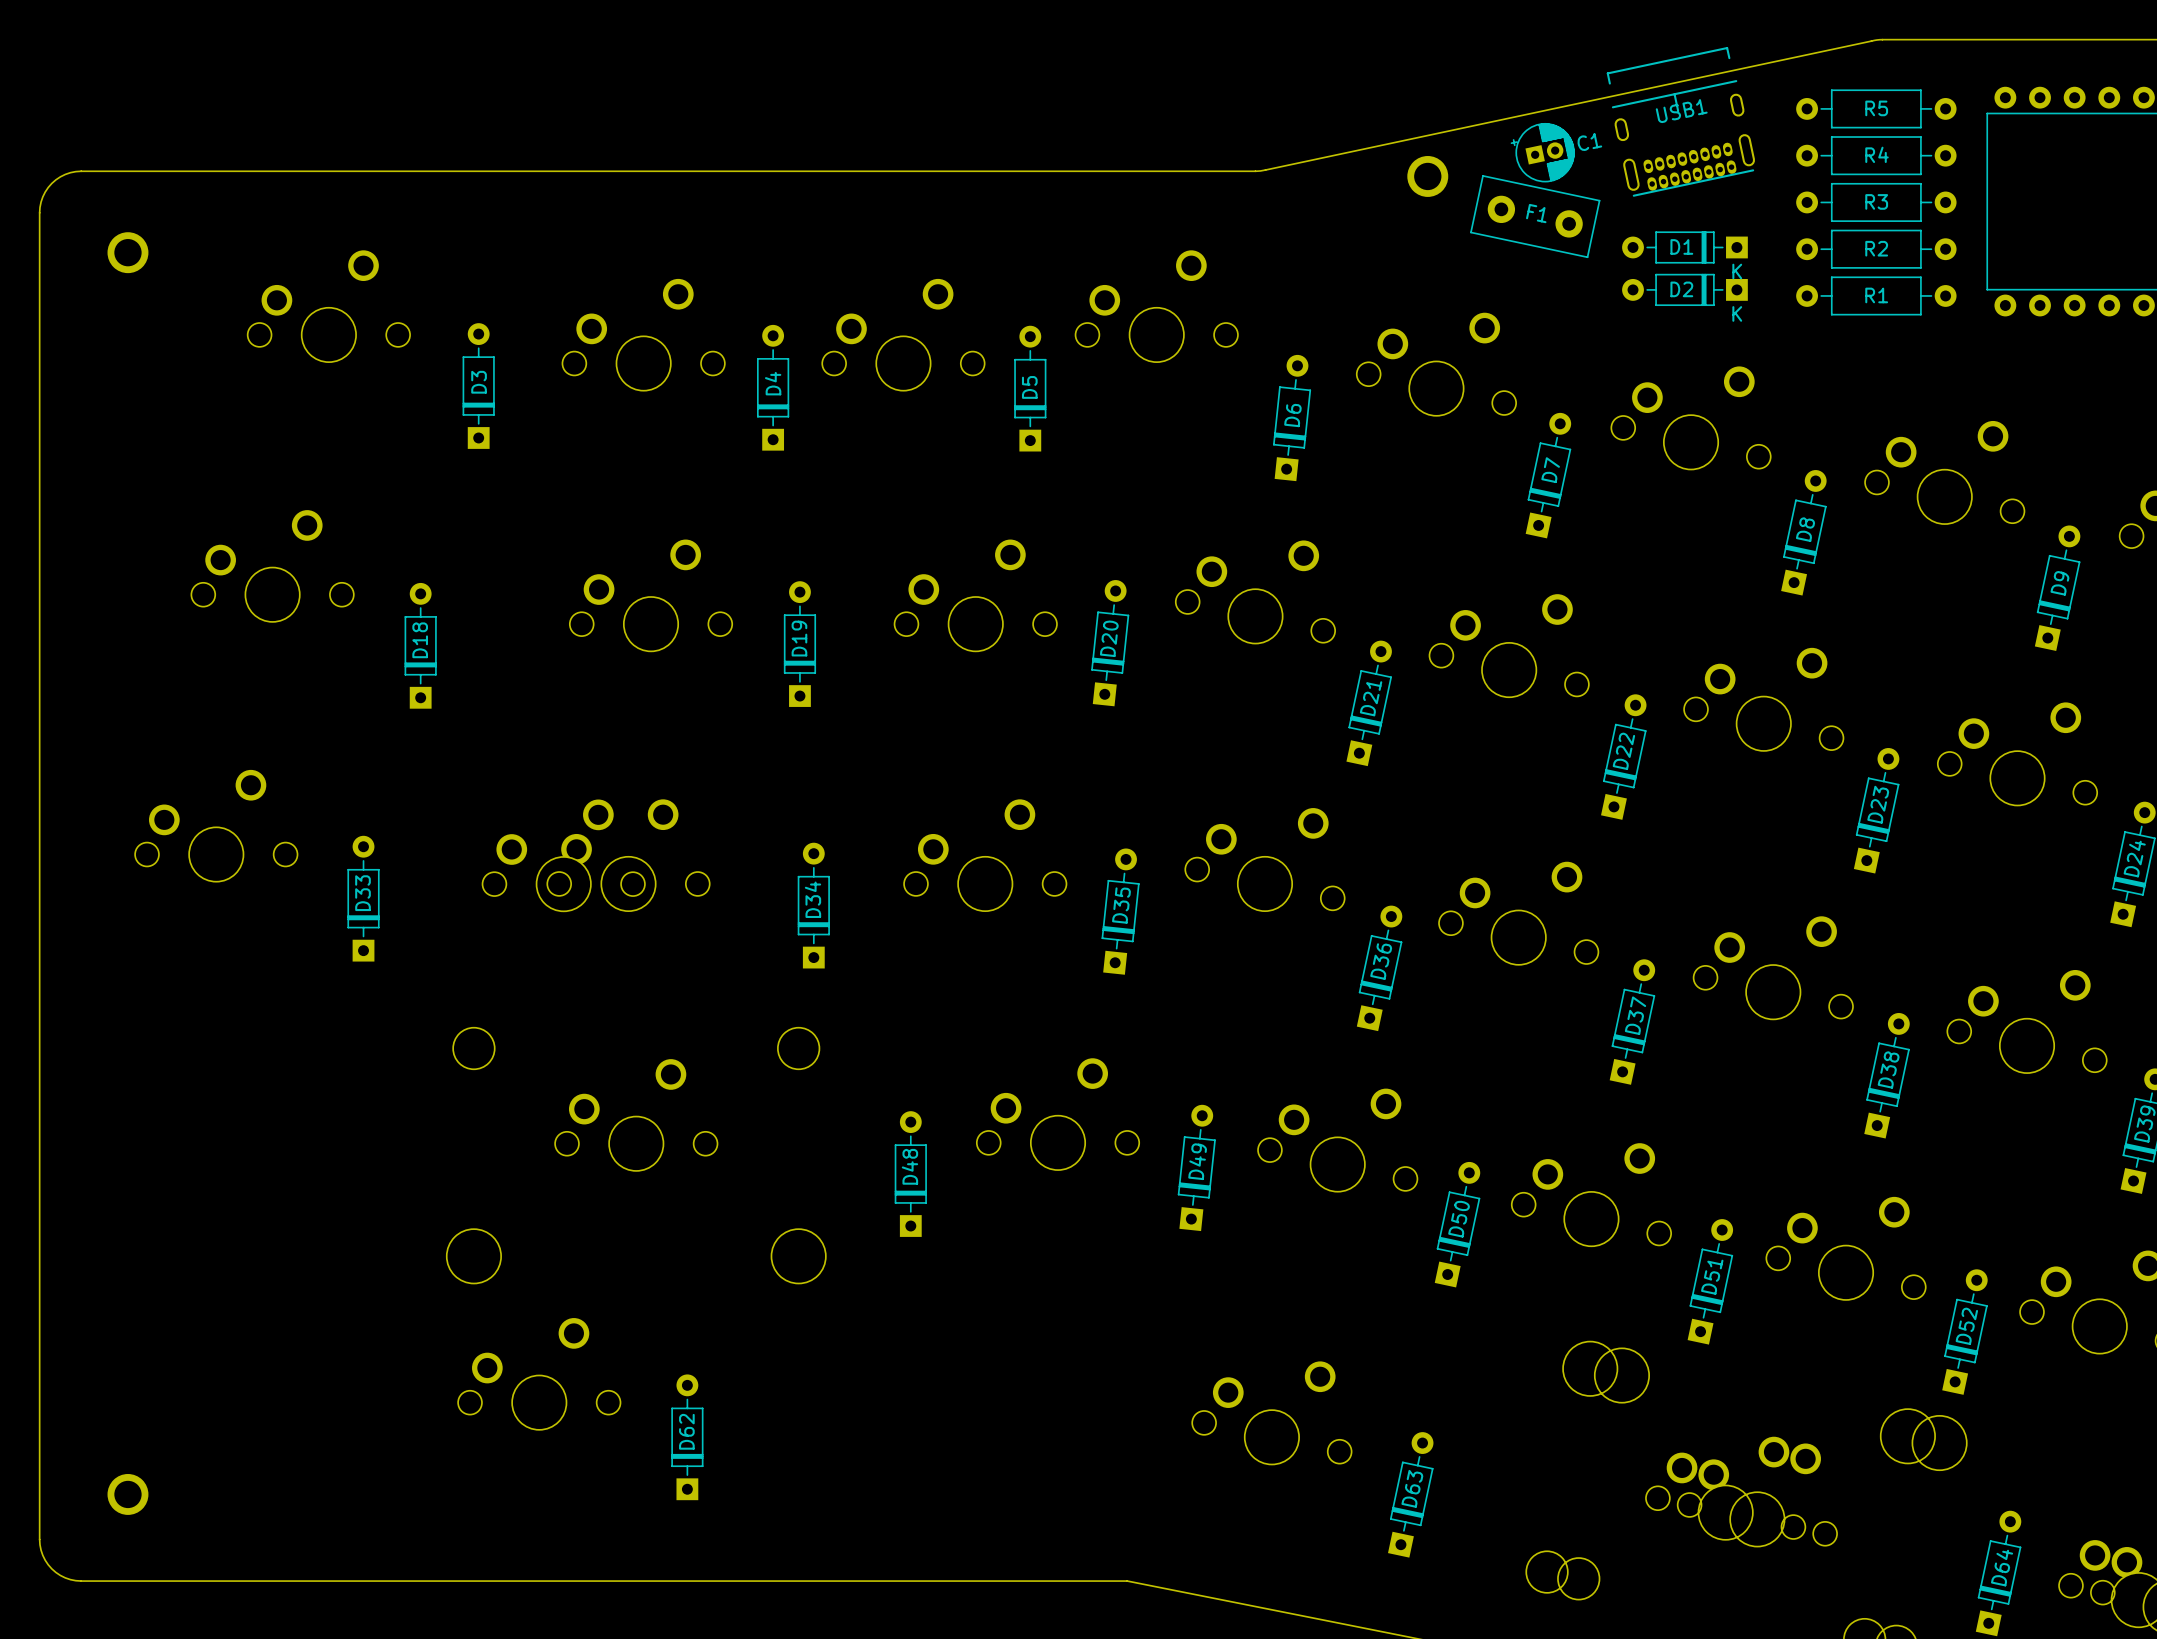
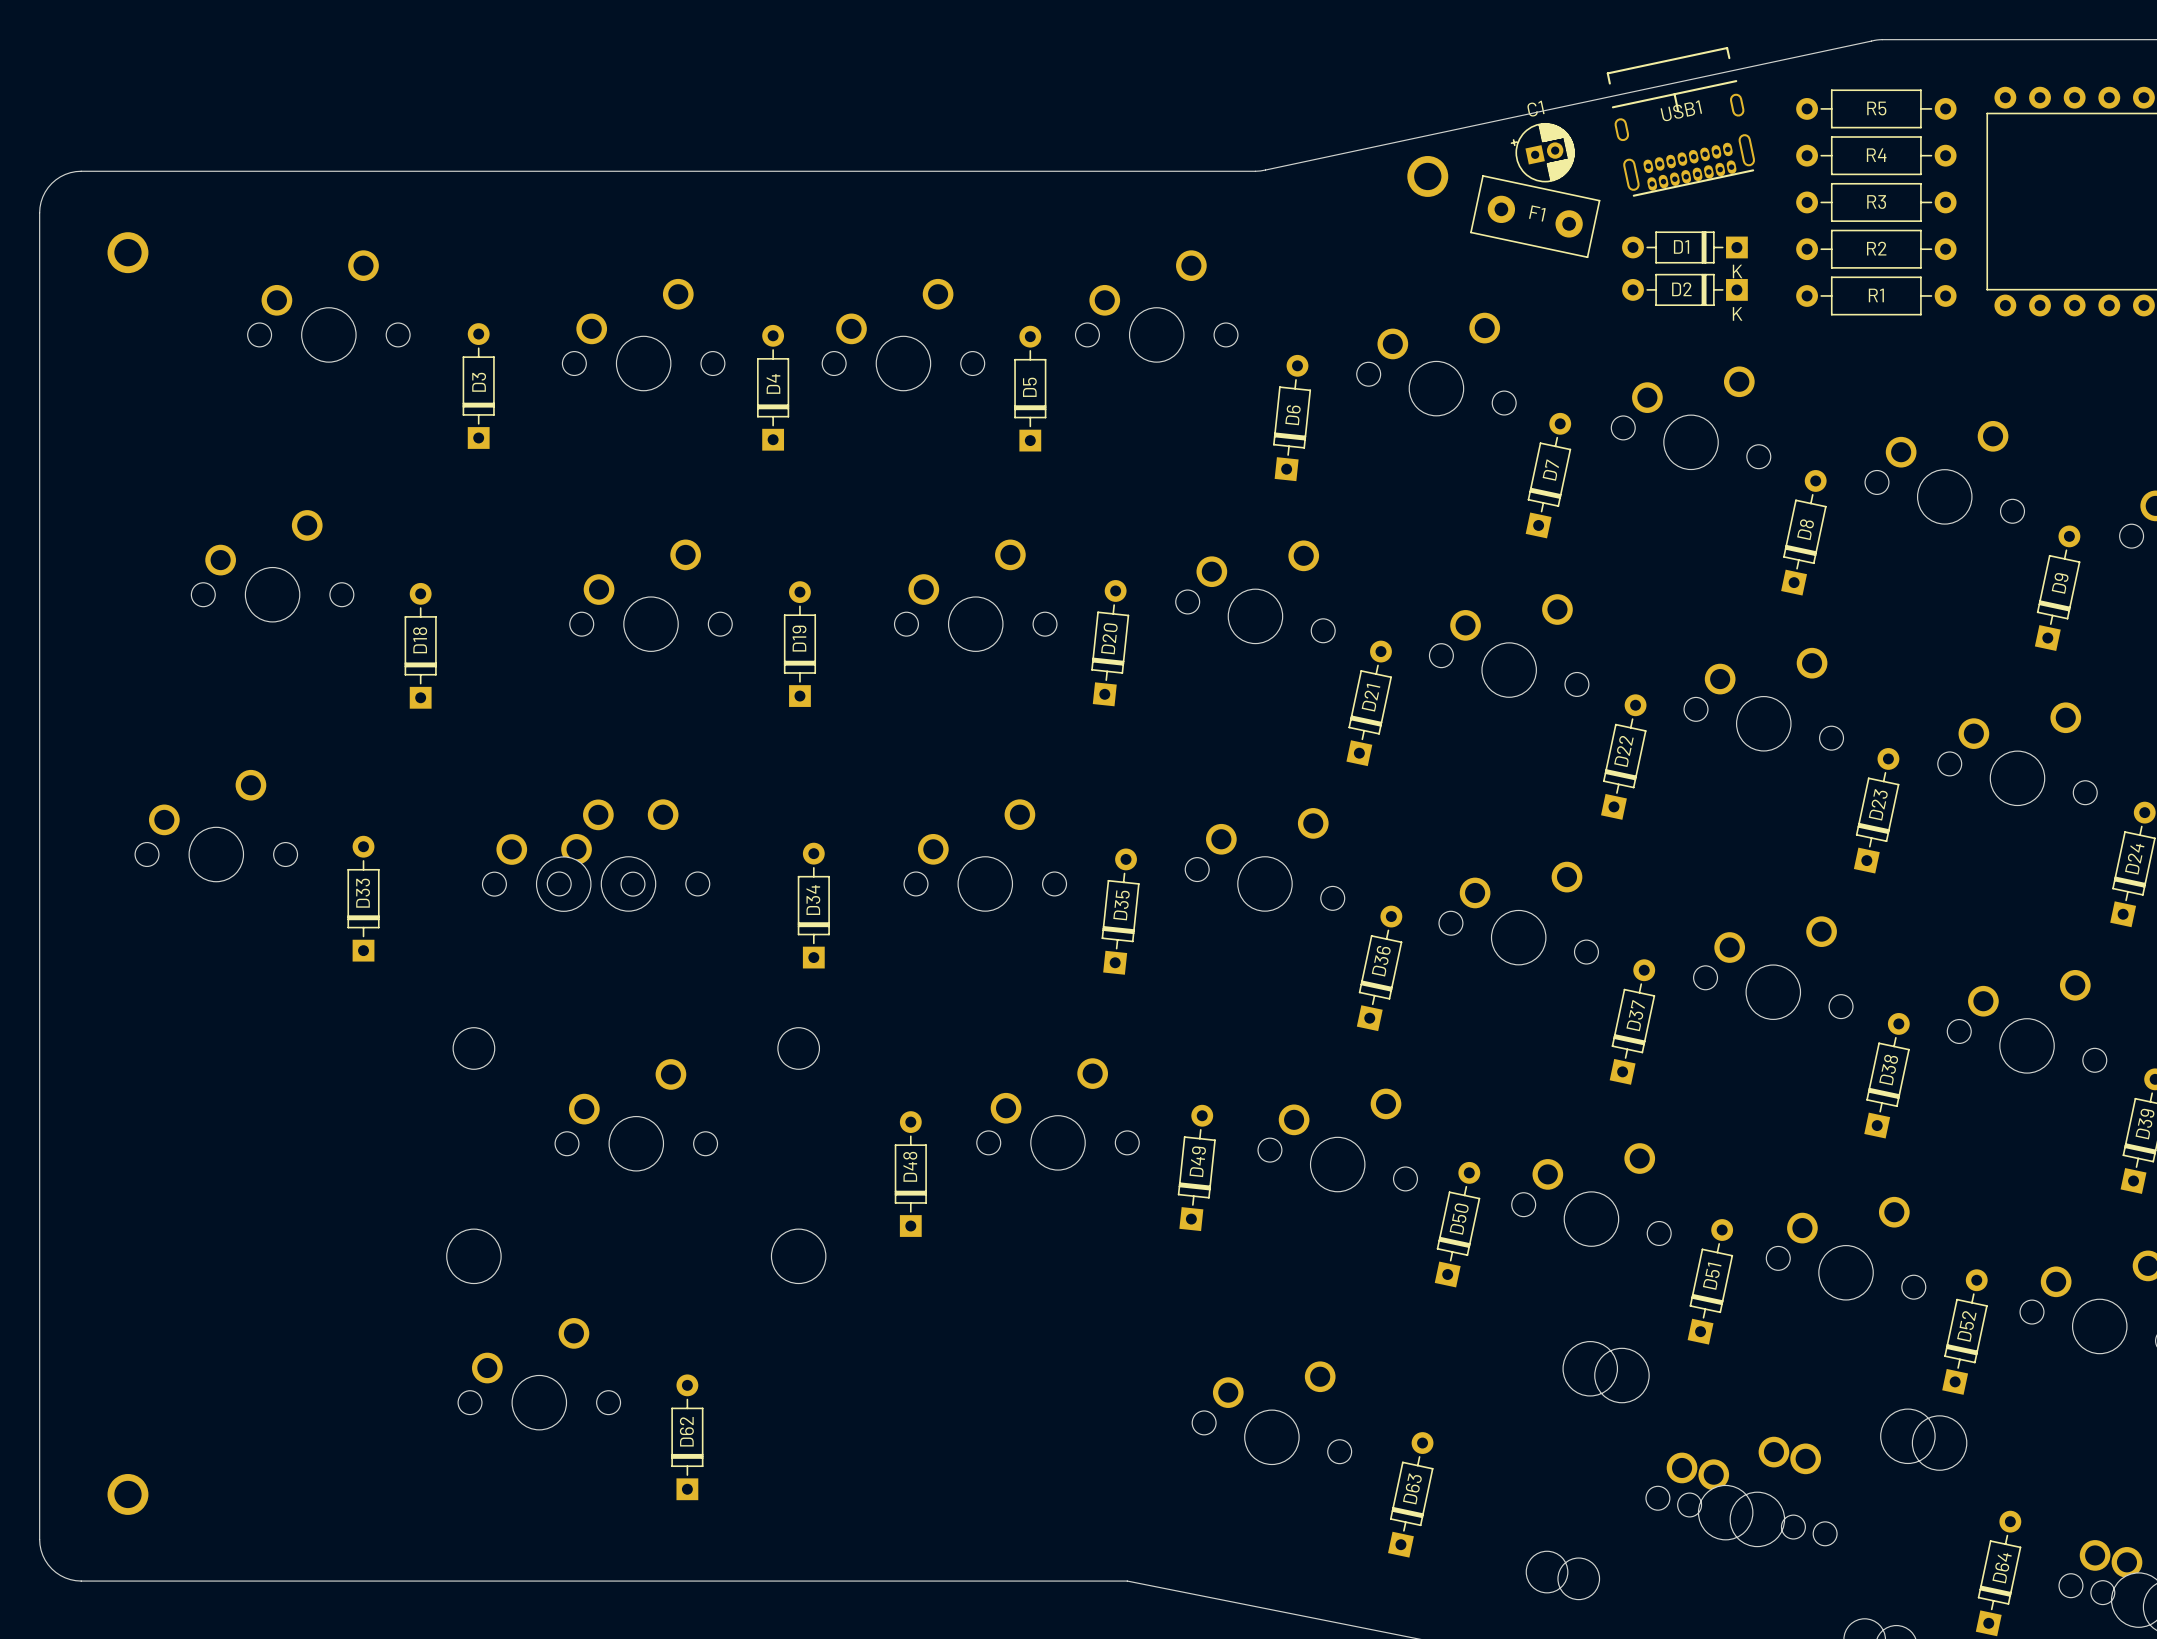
C1 name position: C1 (1589, 141) -> C1 (1535, 108)

